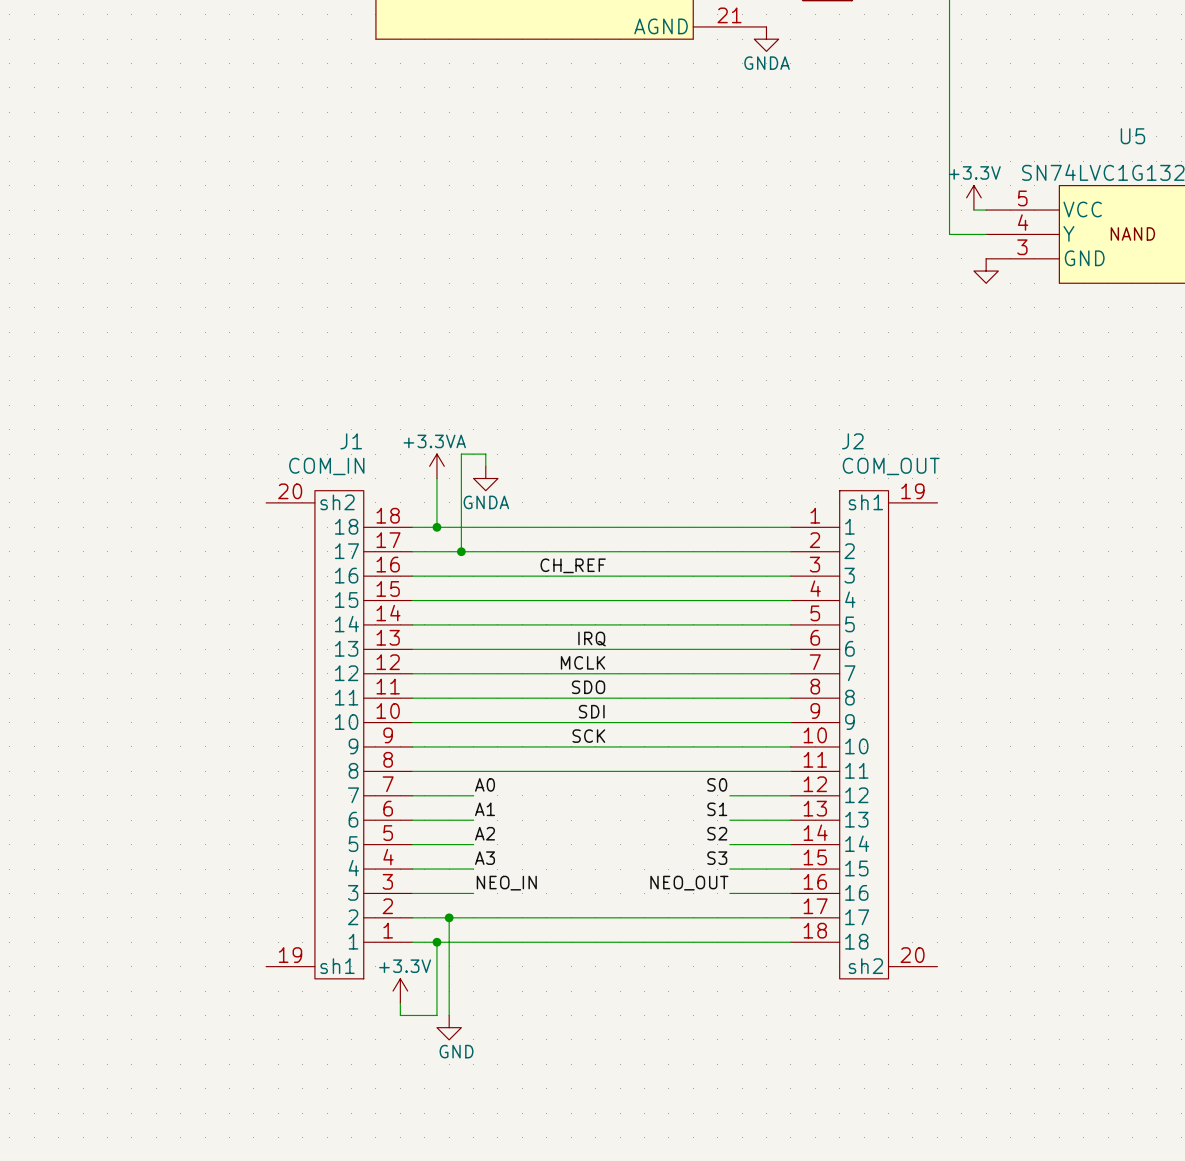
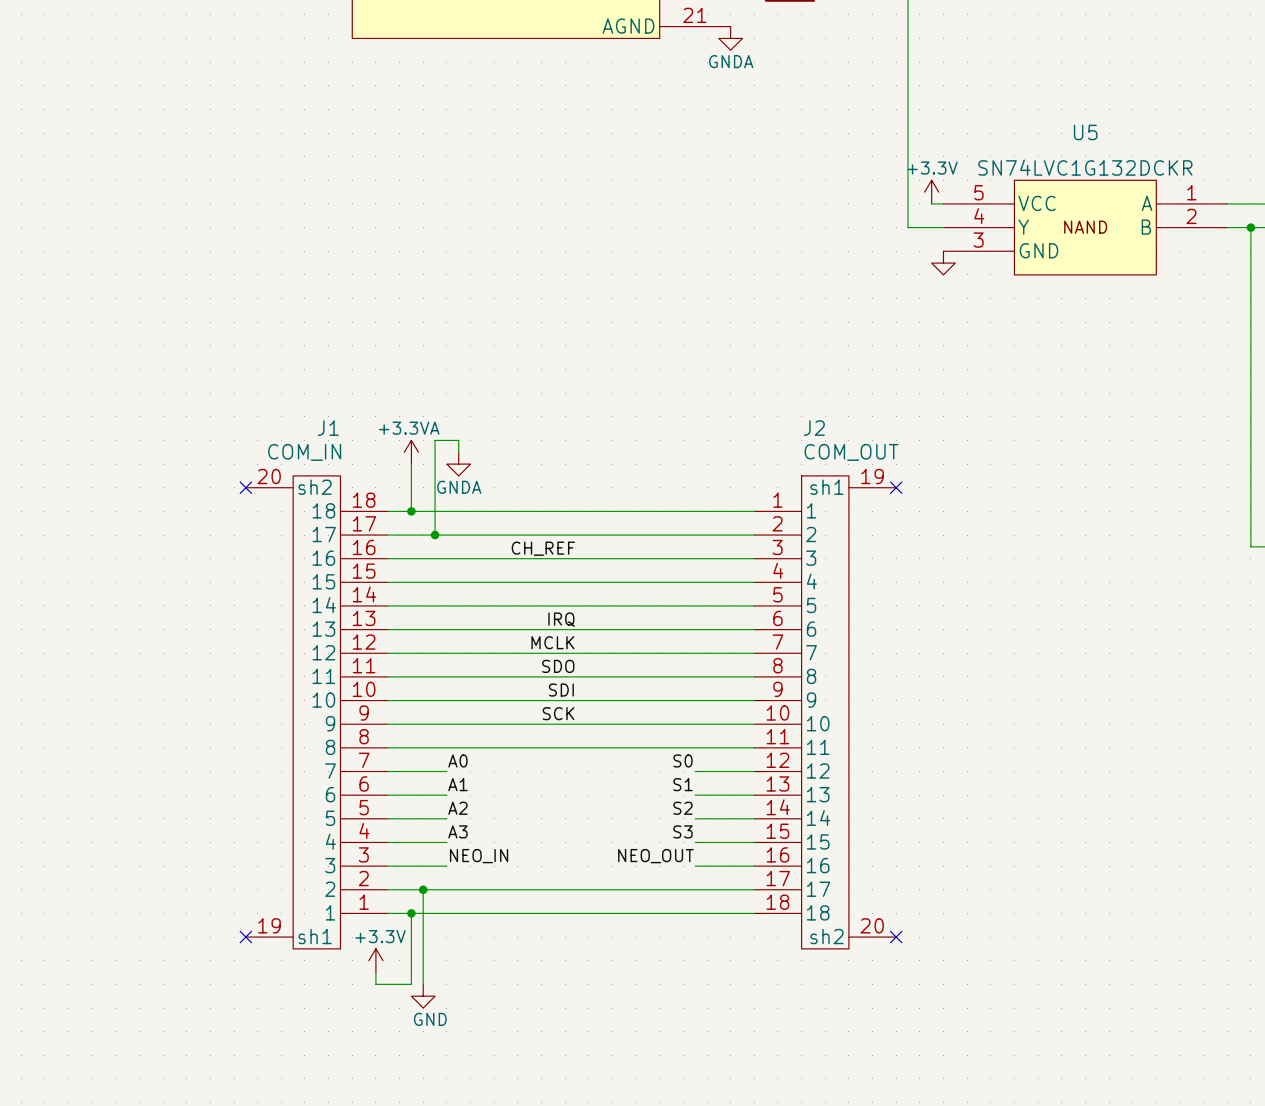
no-connect mark: none -> (245, 487)
no-connect mark: none -> (896, 487)
no-connect mark: none -> (245, 937)
no-connect mark: none -> (896, 937)

